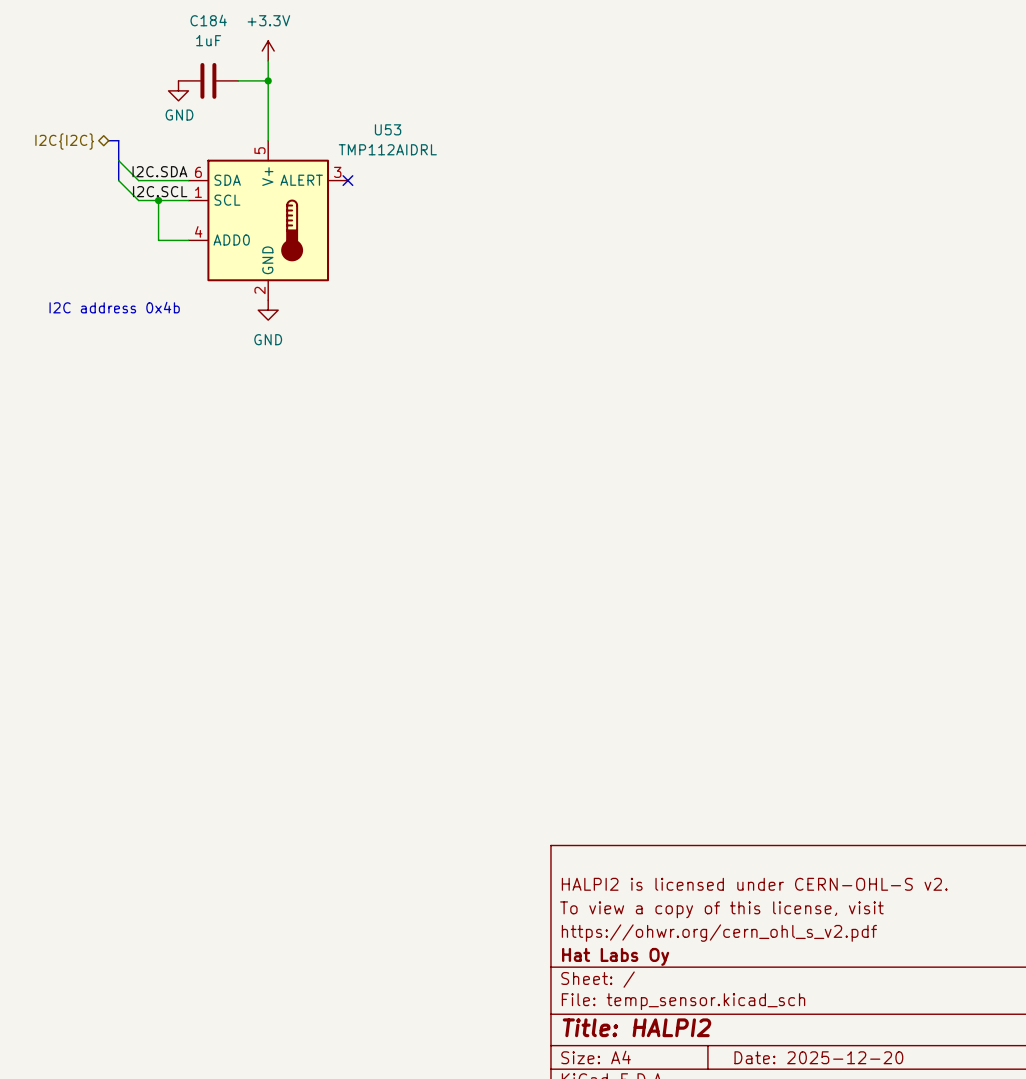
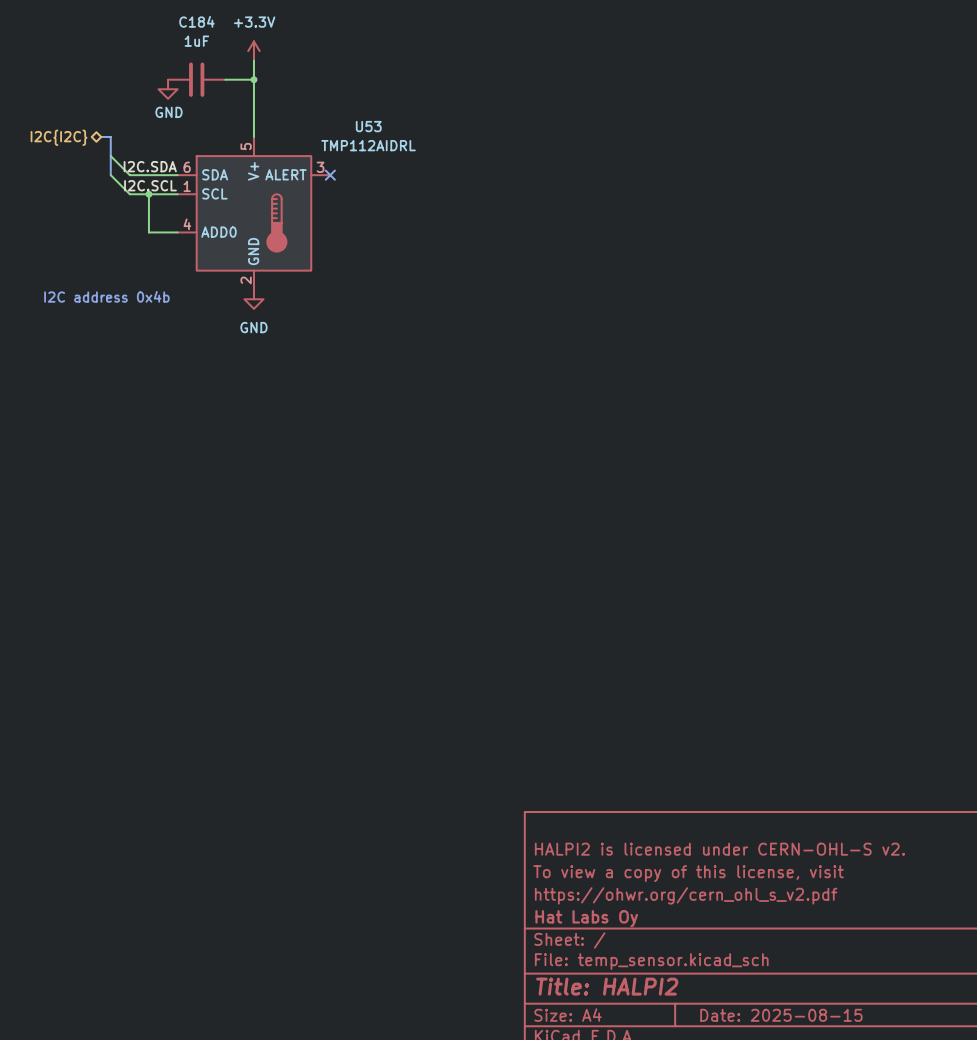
title block: Date: 2025-12-20 (818, 1057) -> Date: 2025-08-15 (781, 1015)

